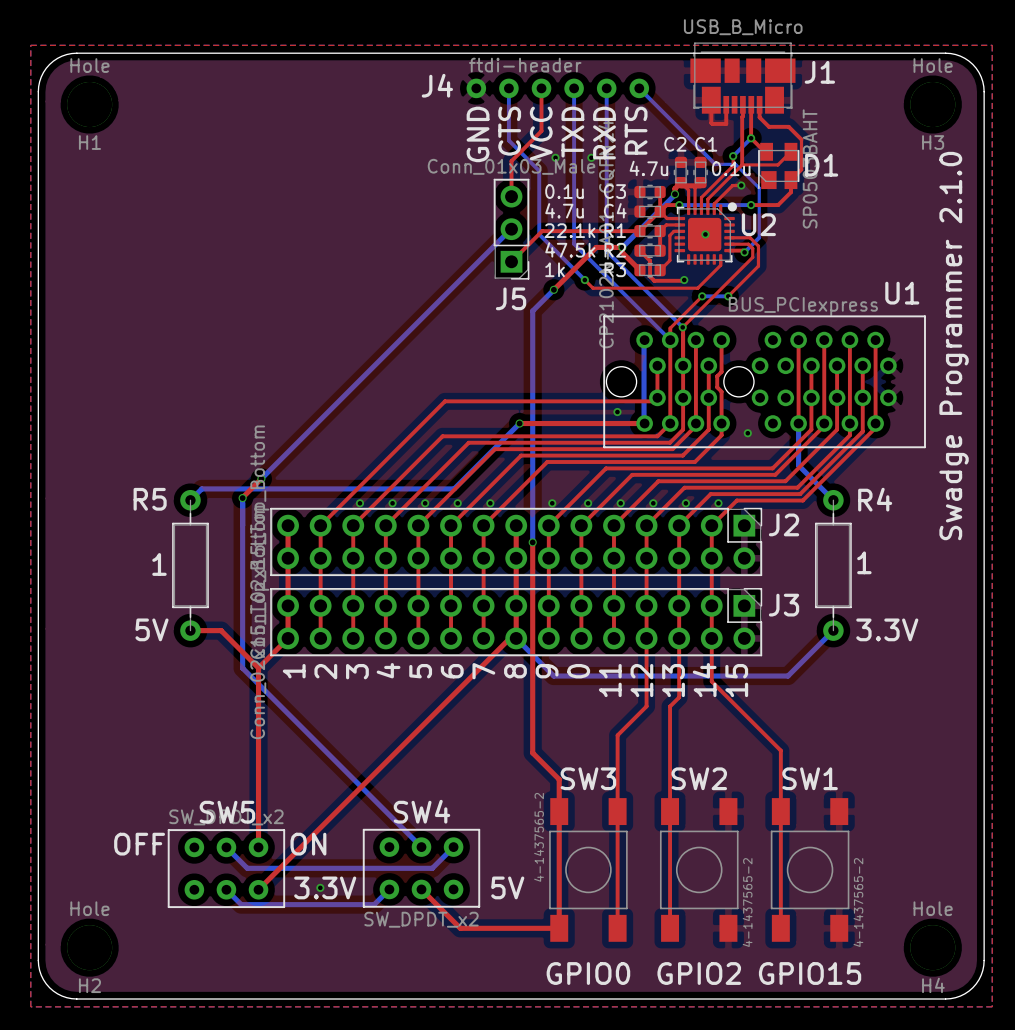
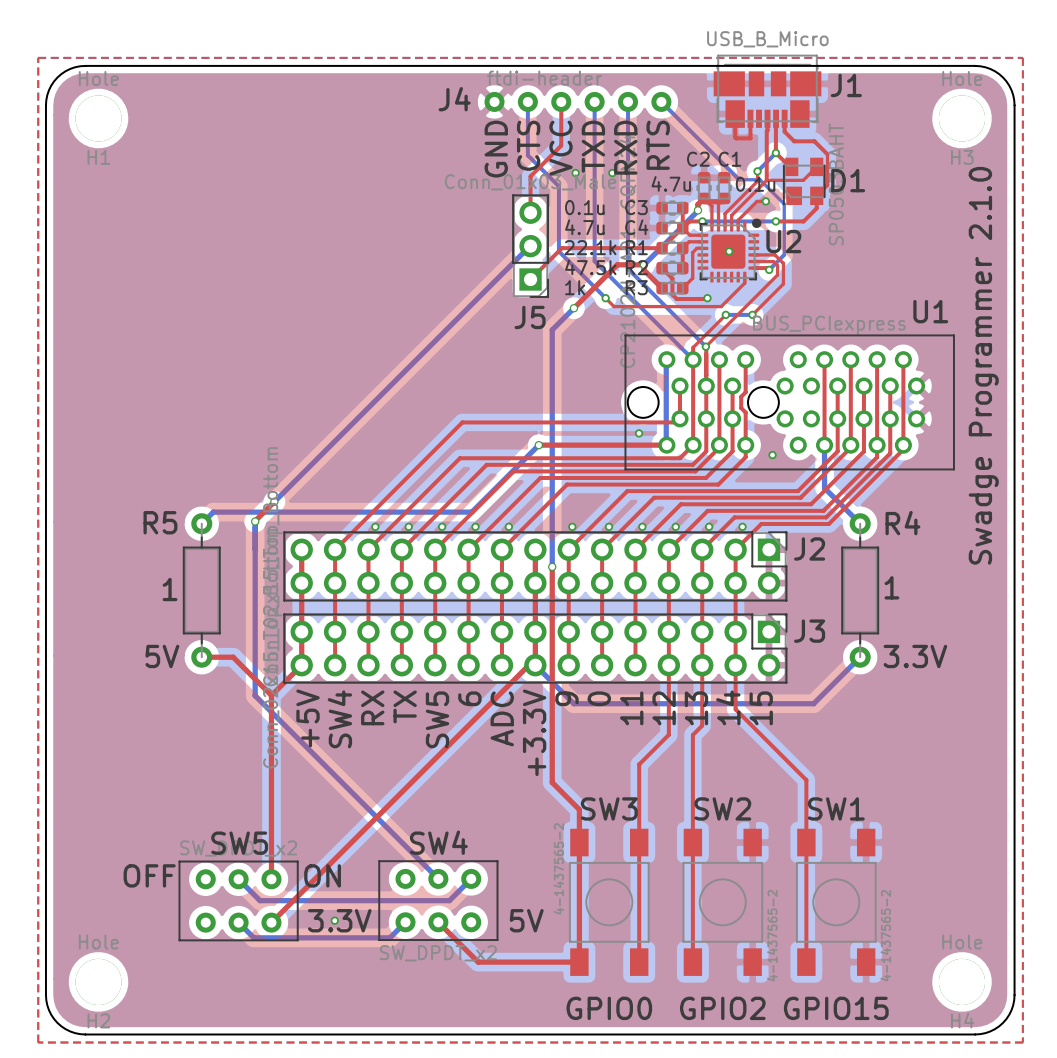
text: 4 (388, 670) -> TX (405, 706)
text: 1 (294, 671) -> +5V (308, 718)
text: 2 (325, 671) -> SW4 (339, 719)
text: 3 (357, 671) -> RX (372, 707)
text: 5 (420, 671) -> SW5 (437, 719)
text: 7 (483, 671) -> ADC (502, 718)
text: 8 (515, 671) -> +3.3V (534, 732)

